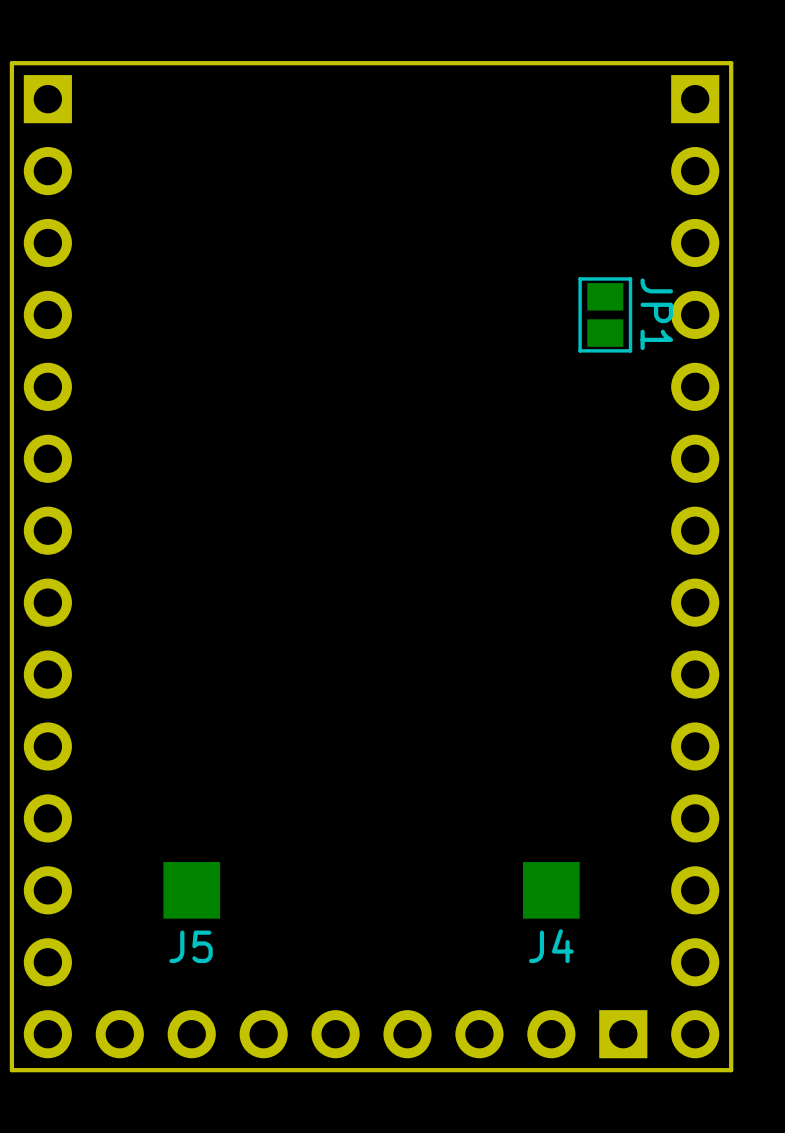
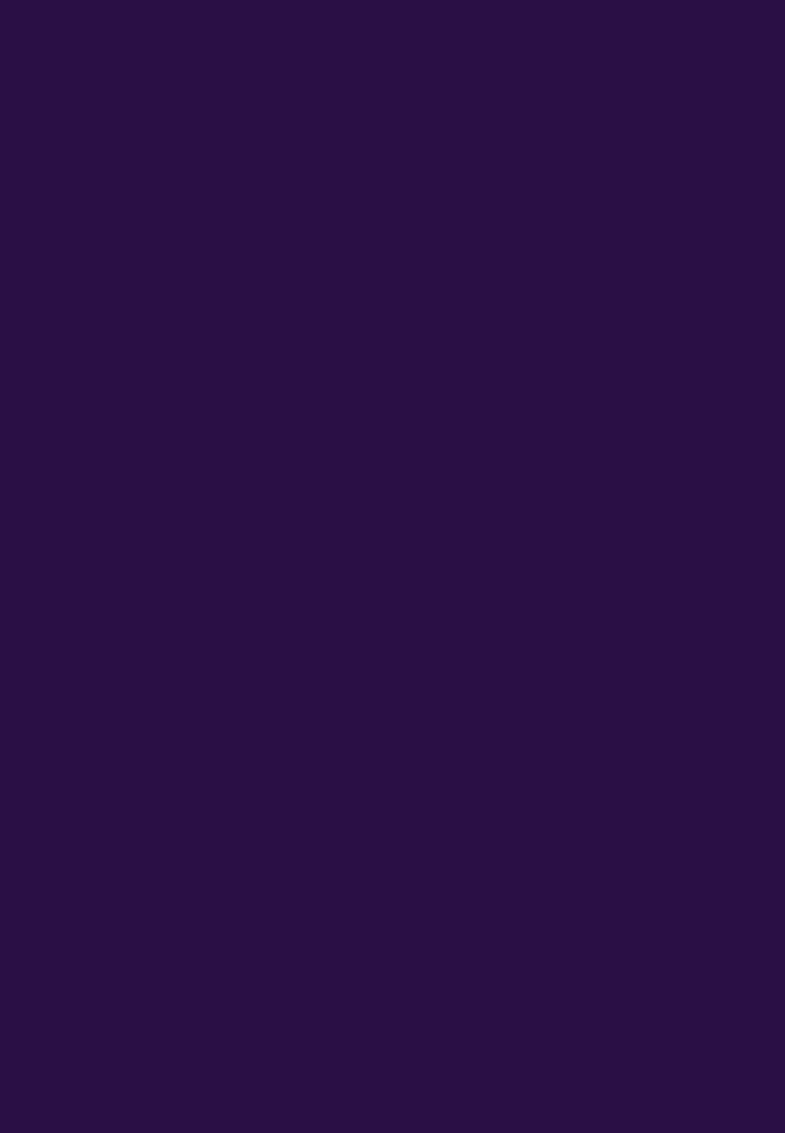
board edge: (731, 63) (11, 63) (11, 1070) (731, 1070) (731, 63) -> none
JP1: (605, 314) -> none
part: (47, 566) -> none
part: (695, 566) -> none
J5: (191, 890) -> none
J4: (551, 890) -> none
part: (371, 1034) -> none

